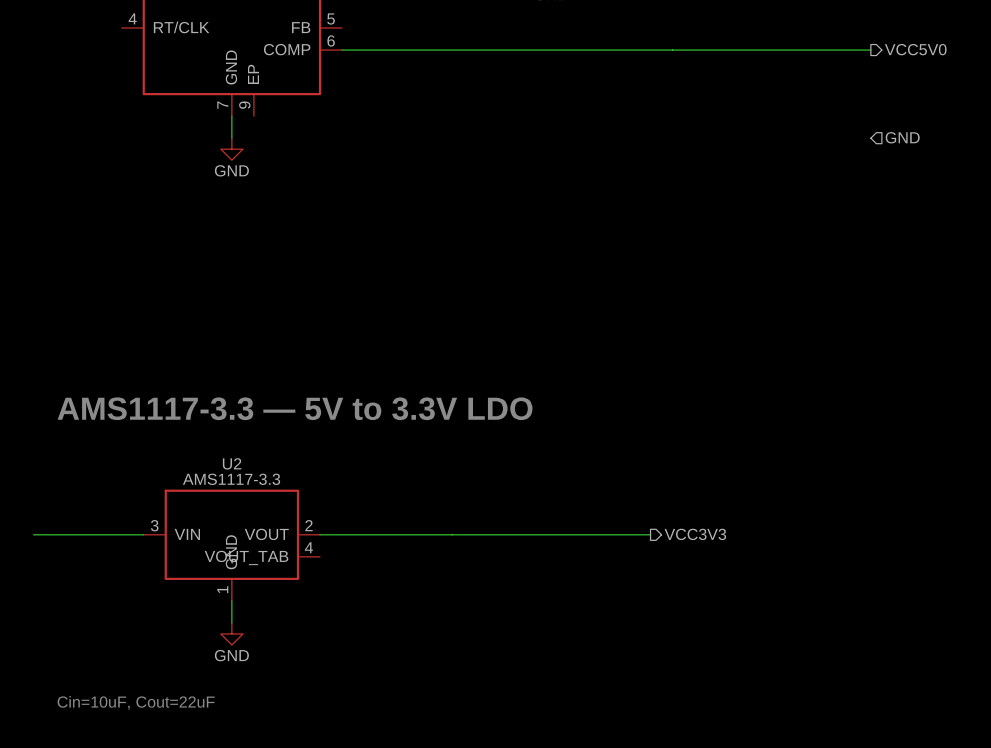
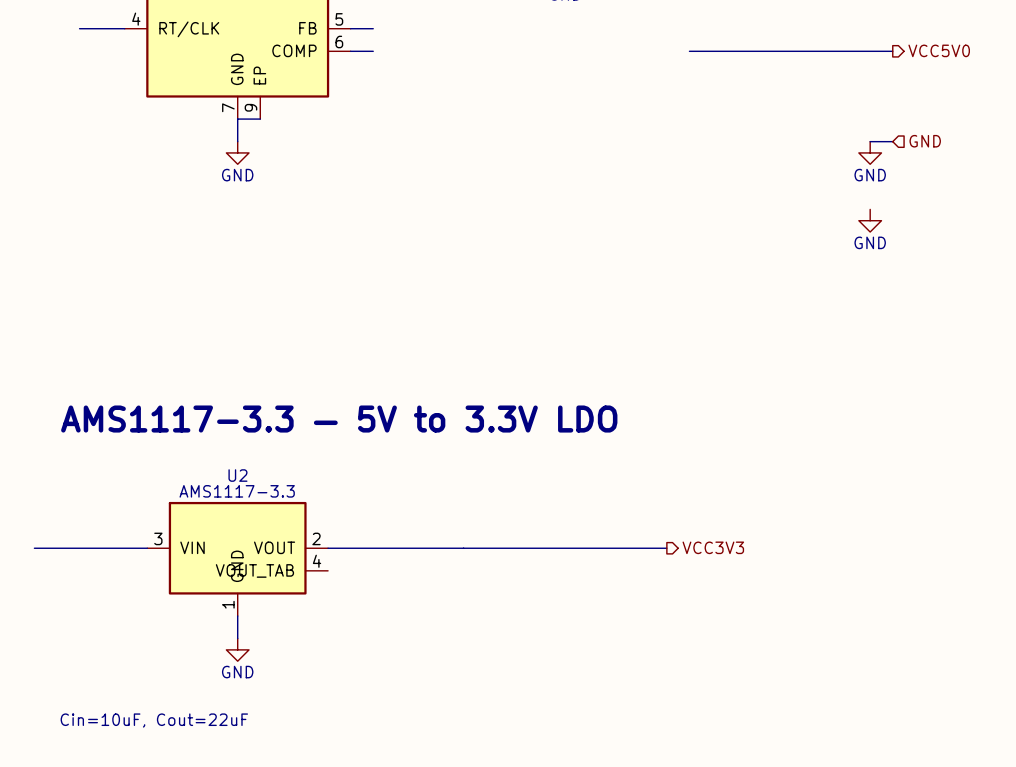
wire: none -> (79, 28) (124, 28)
wire: none -> (350, 28) (373, 28)
wire: (364, 50) (672, 50) -> none
wire: none -> (237, 119) (260, 119)
wire: none -> (870, 141) (892, 141)
power symbol: none -> GND (870, 152)
power symbol: none -> GND (870, 220)

